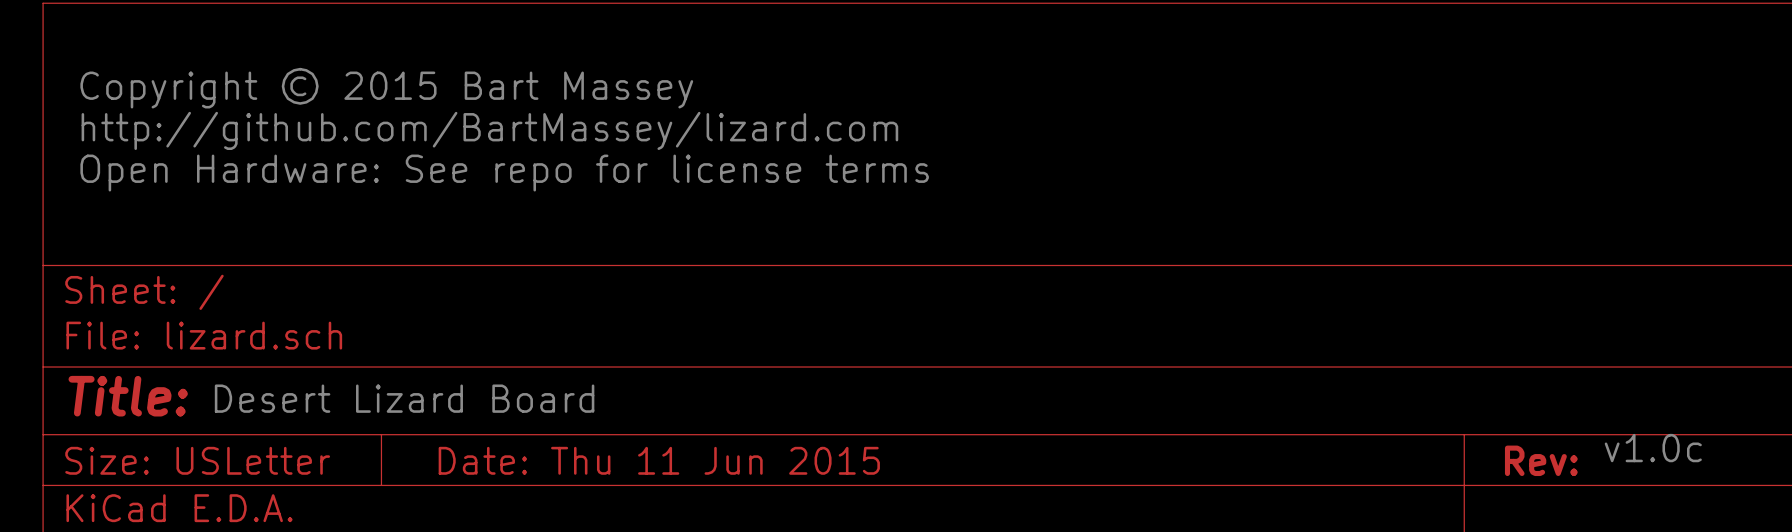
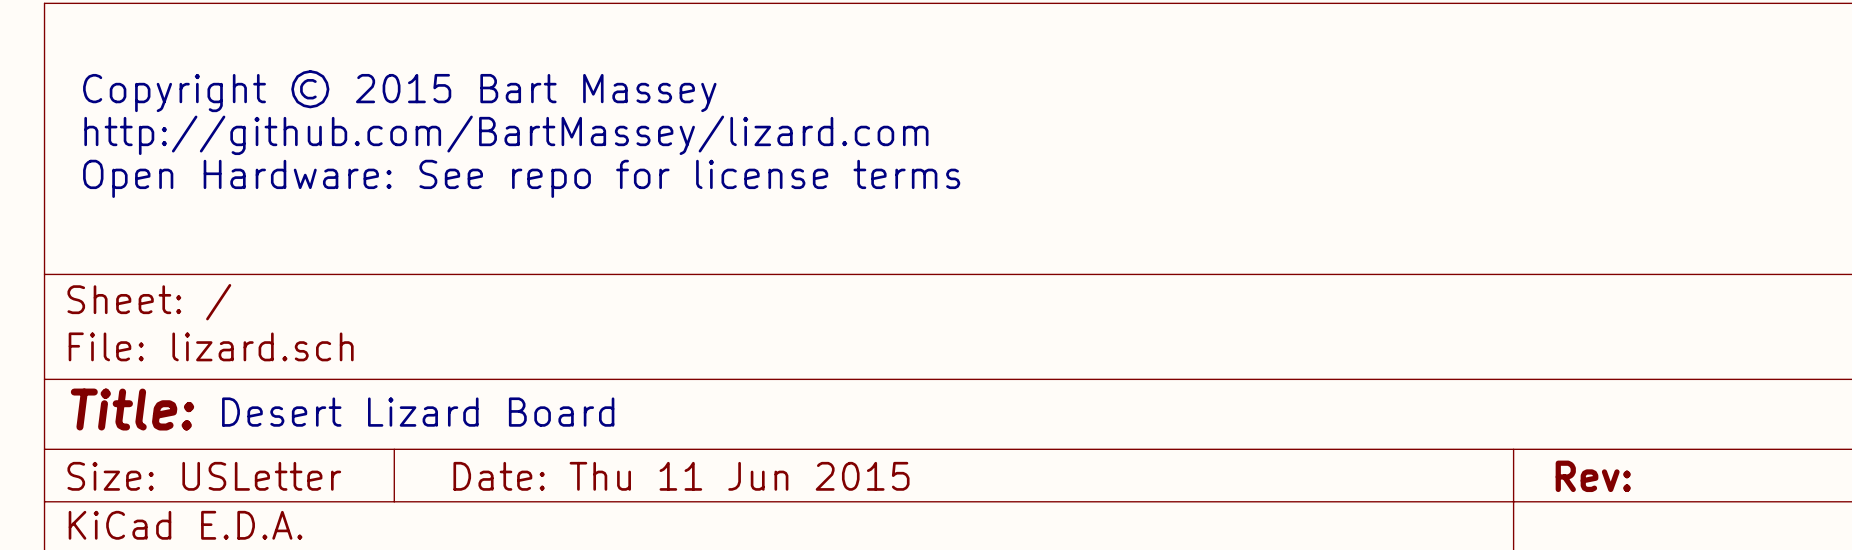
text: v1.0c (1653, 448) -> none

